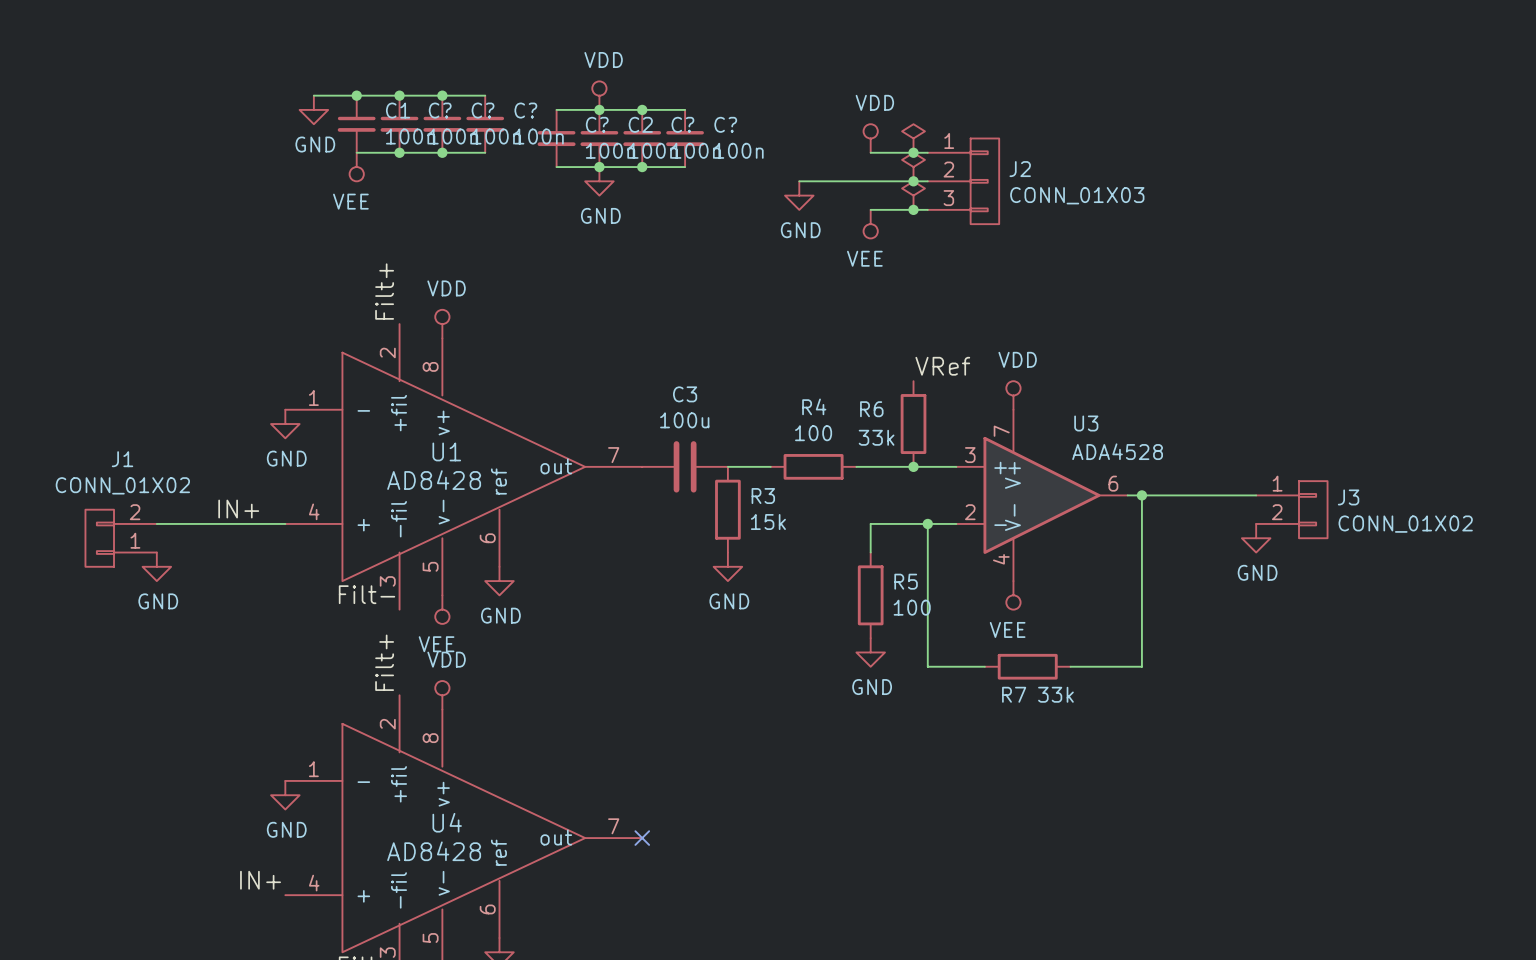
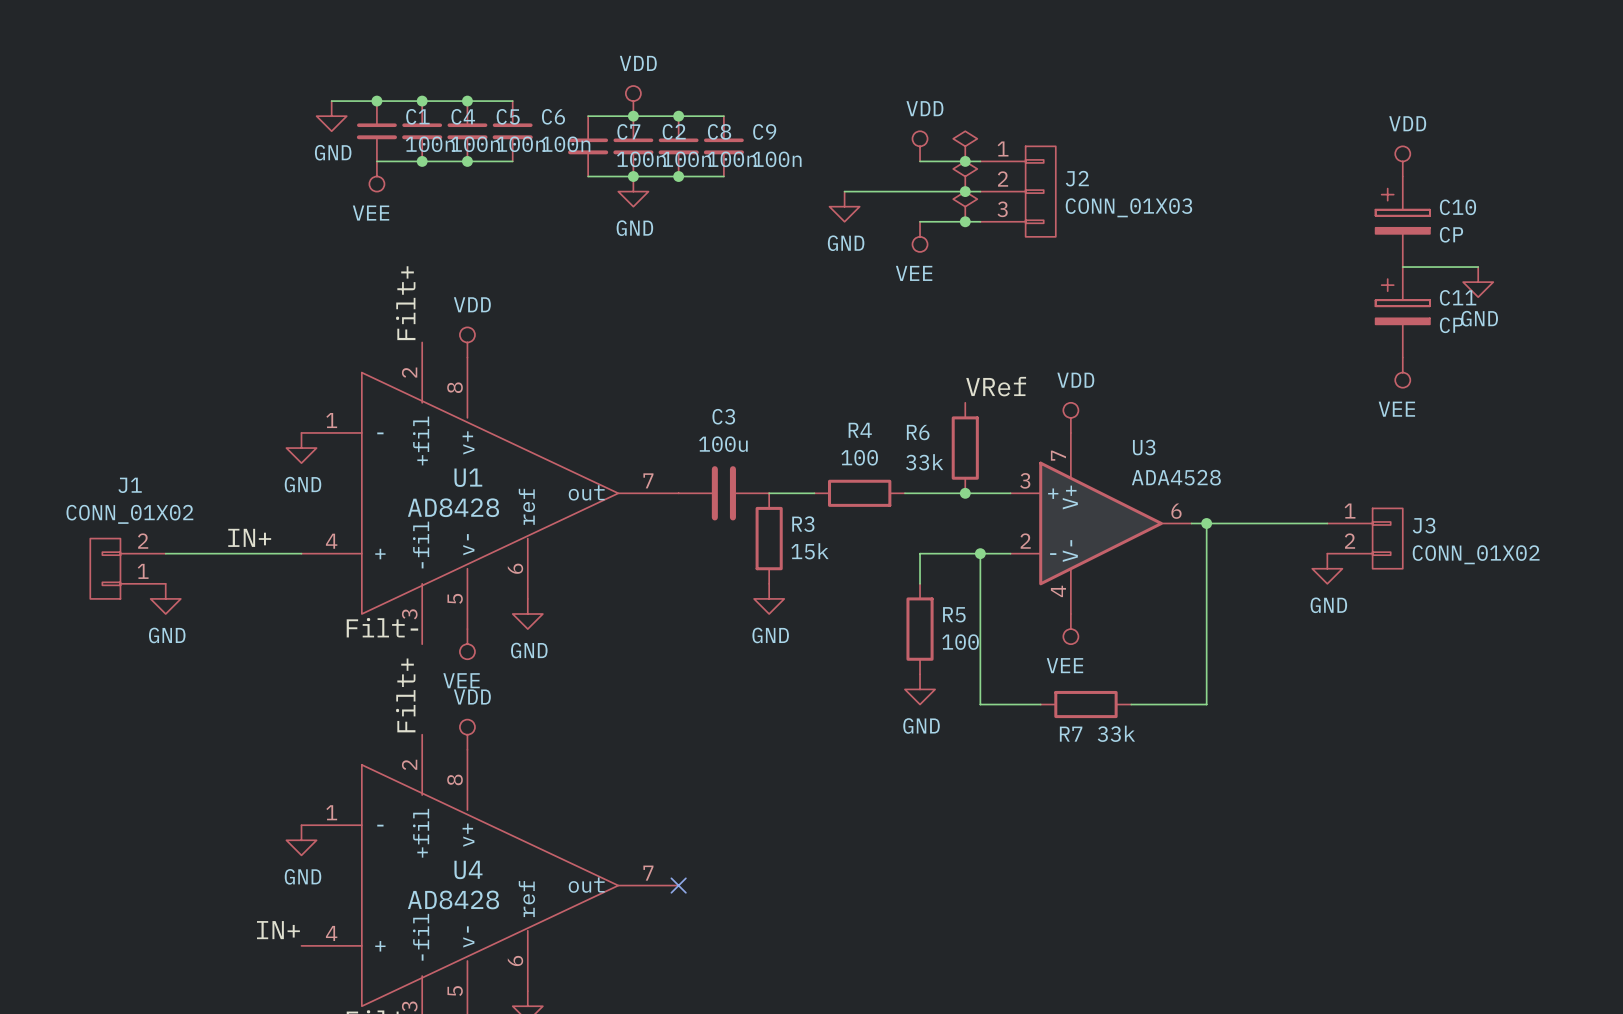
C? name: C? (440, 110) -> C4 (463, 116)
C? name: C? (483, 110) -> C5 (508, 116)
C? name: C? (525, 110) -> C6 (553, 116)
C? name: C? (597, 124) -> C7 (628, 131)
C? name: C? (682, 124) -> C8 (719, 131)
C? name: C? (725, 124) -> C9 (764, 131)
power symbol: none -> VDD (1402, 161)
C10: none -> CP (1402, 221)
wire: none -> (1402, 267) (1478, 267)
power symbol: none -> GND (1478, 282)
C11: none -> CP (1402, 312)
power symbol: none -> VEE (1402, 372)

